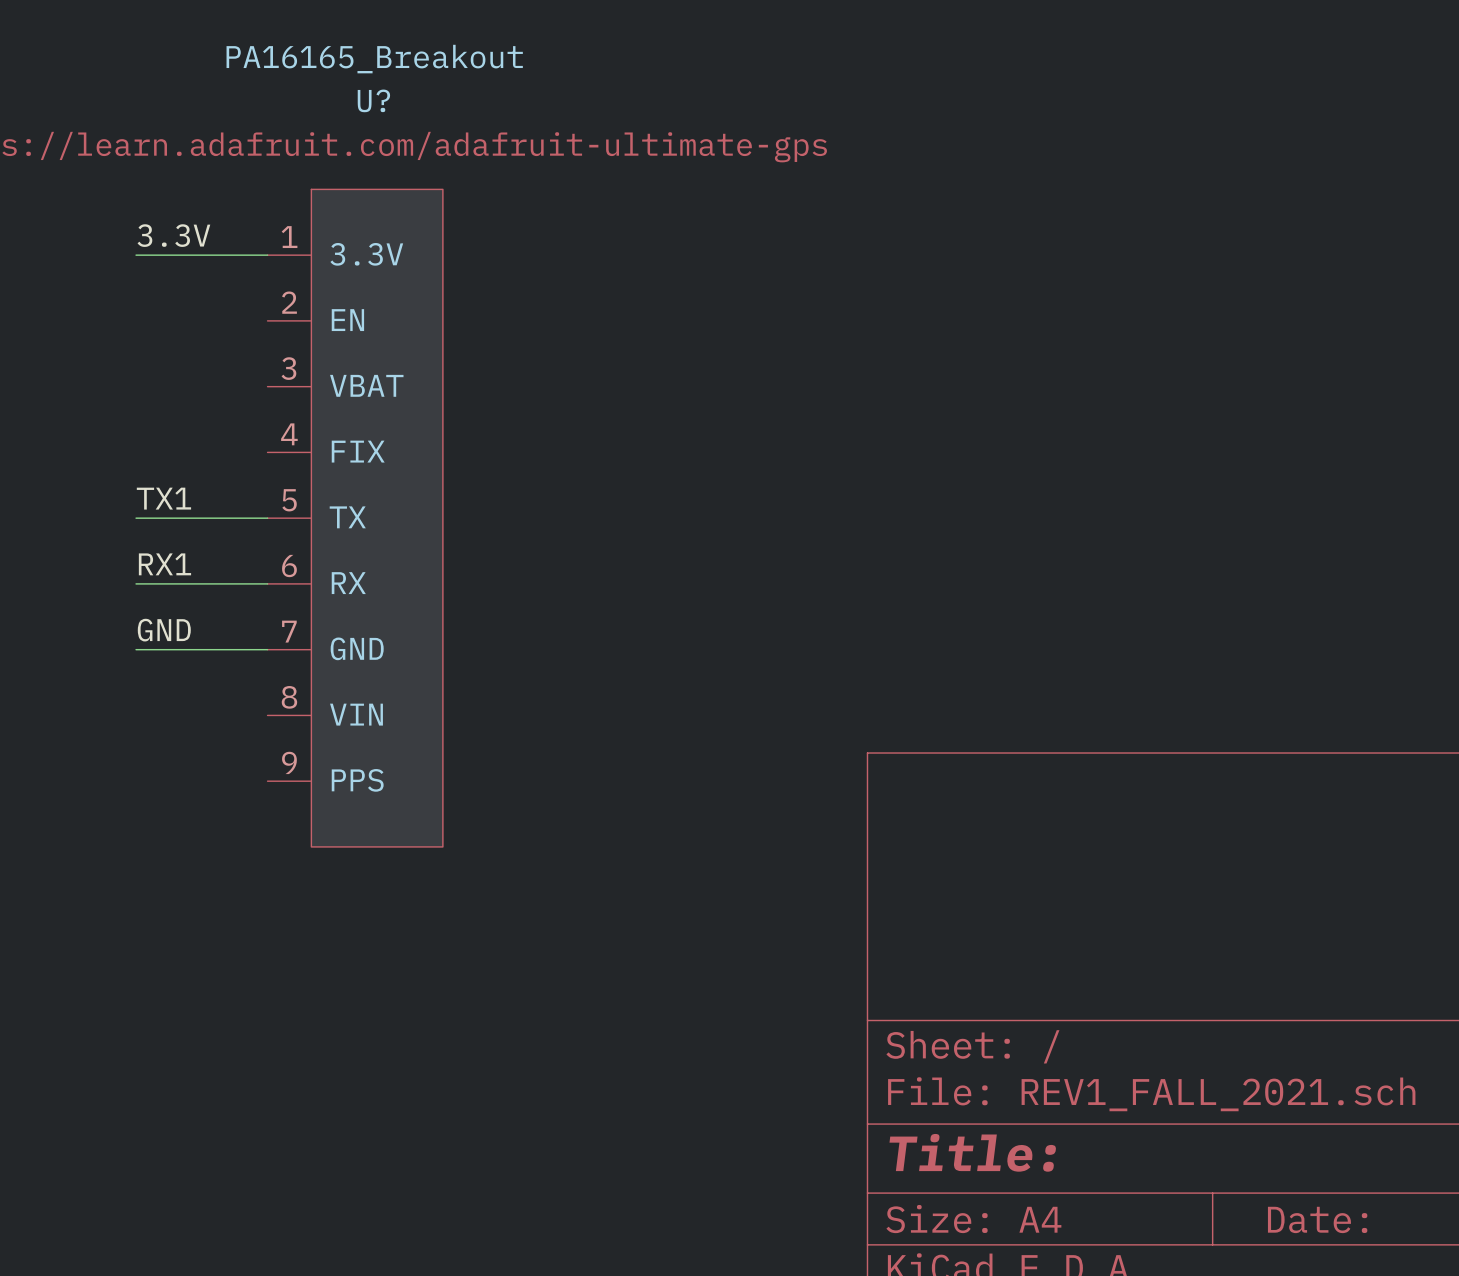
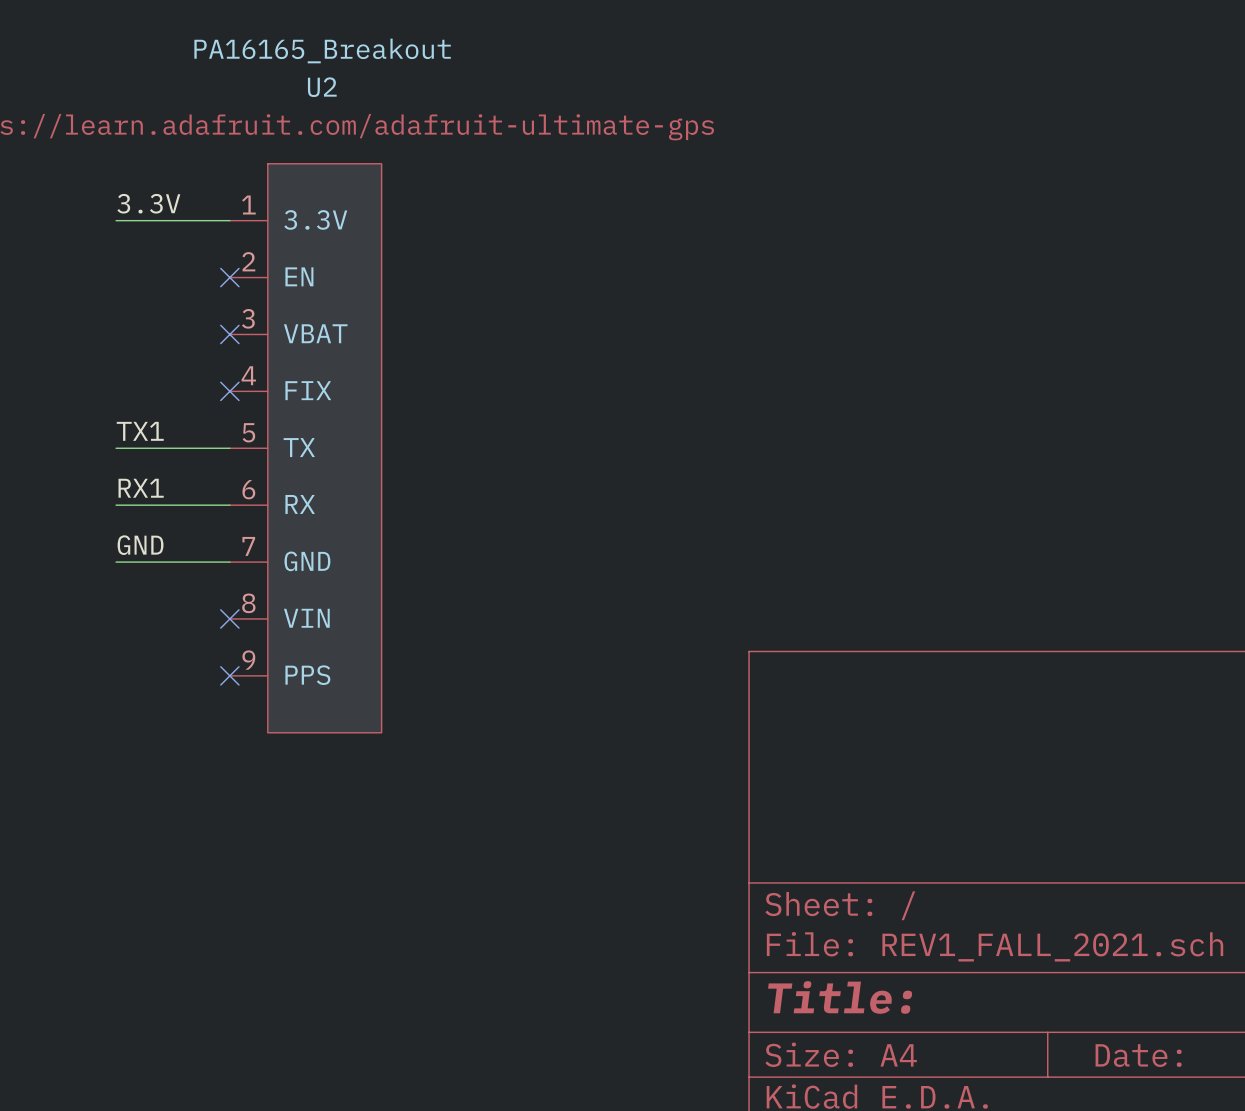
U? name: U? (373, 100) -> U2 (322, 87)
no-connect mark: none -> (229, 277)
no-connect mark: none -> (229, 334)
no-connect mark: none -> (229, 391)
no-connect mark: none -> (229, 618)
no-connect mark: none -> (229, 675)

